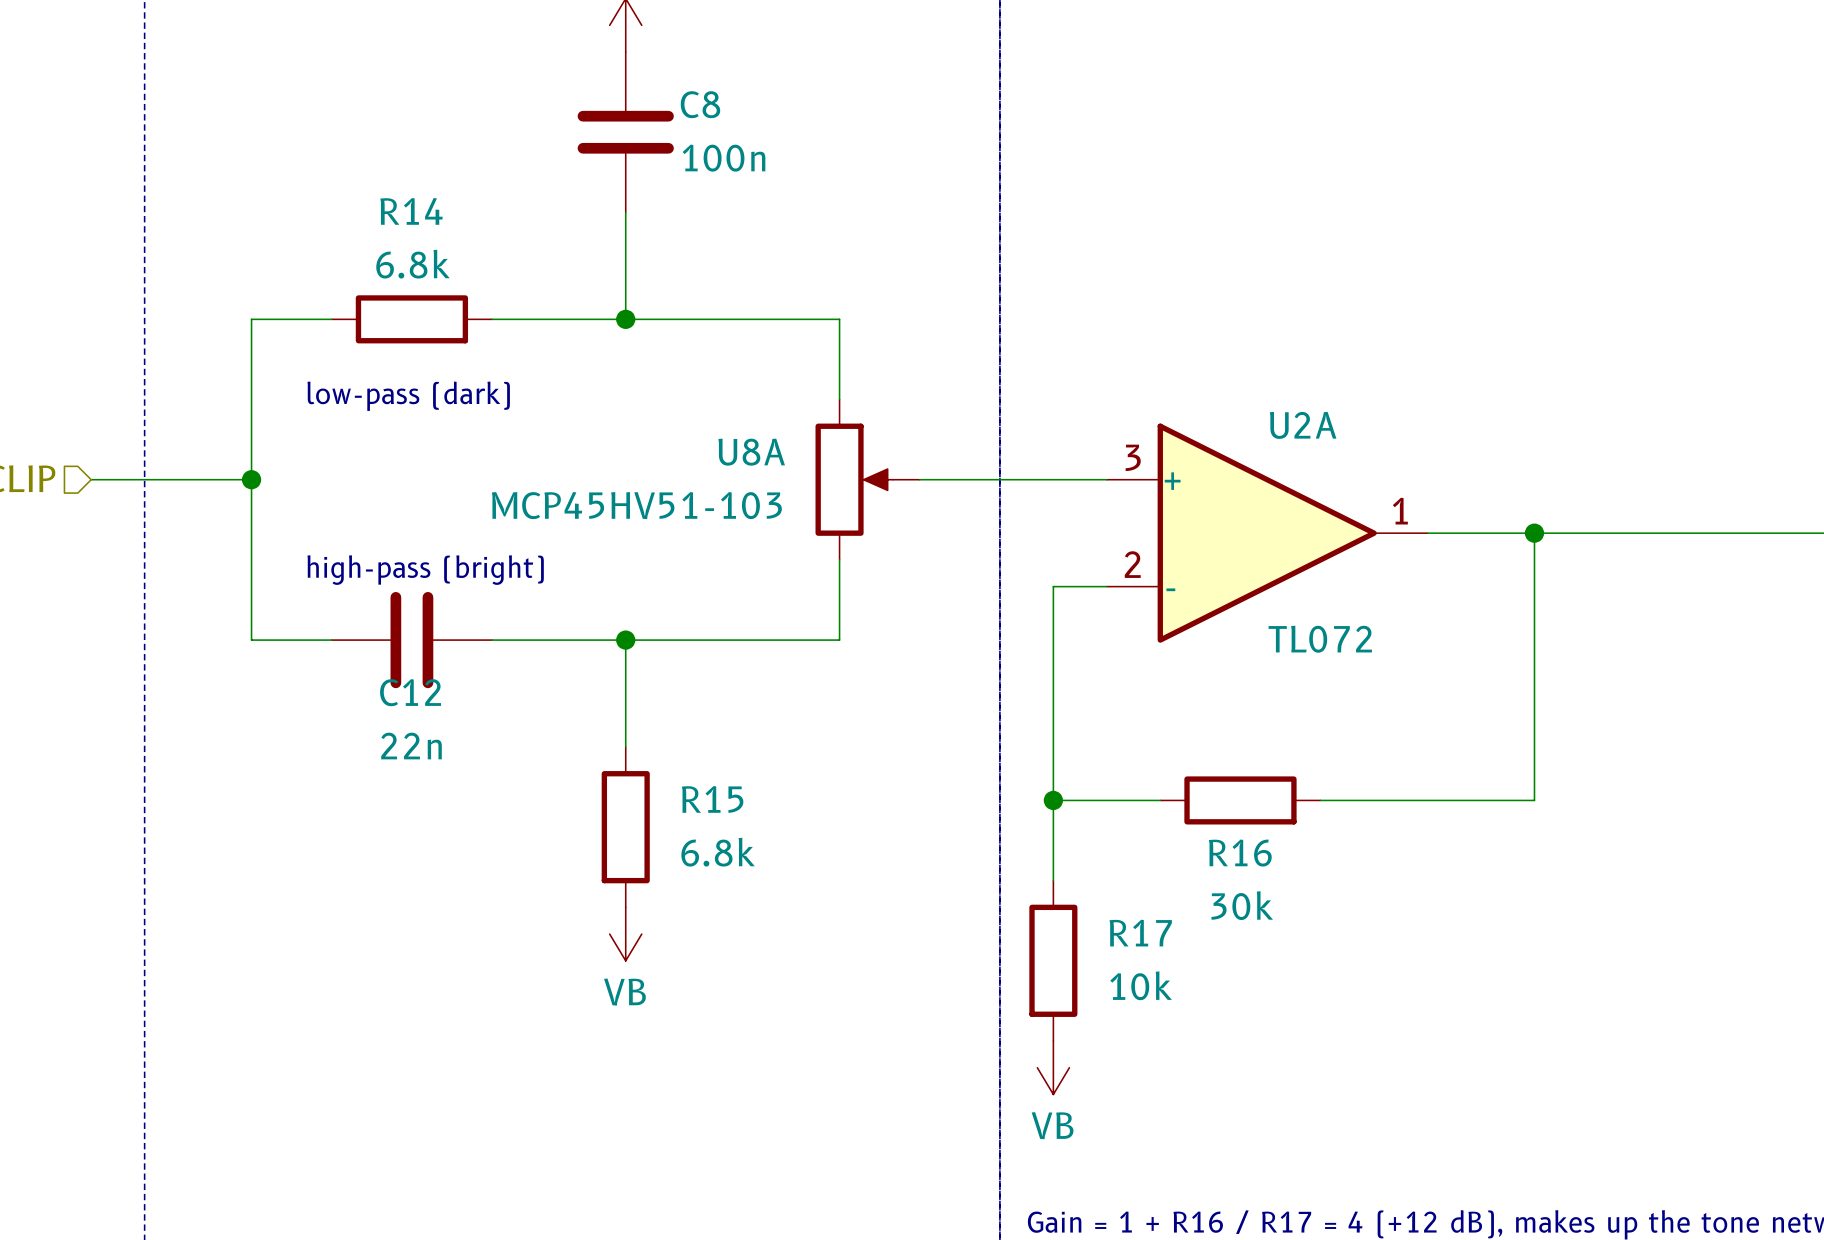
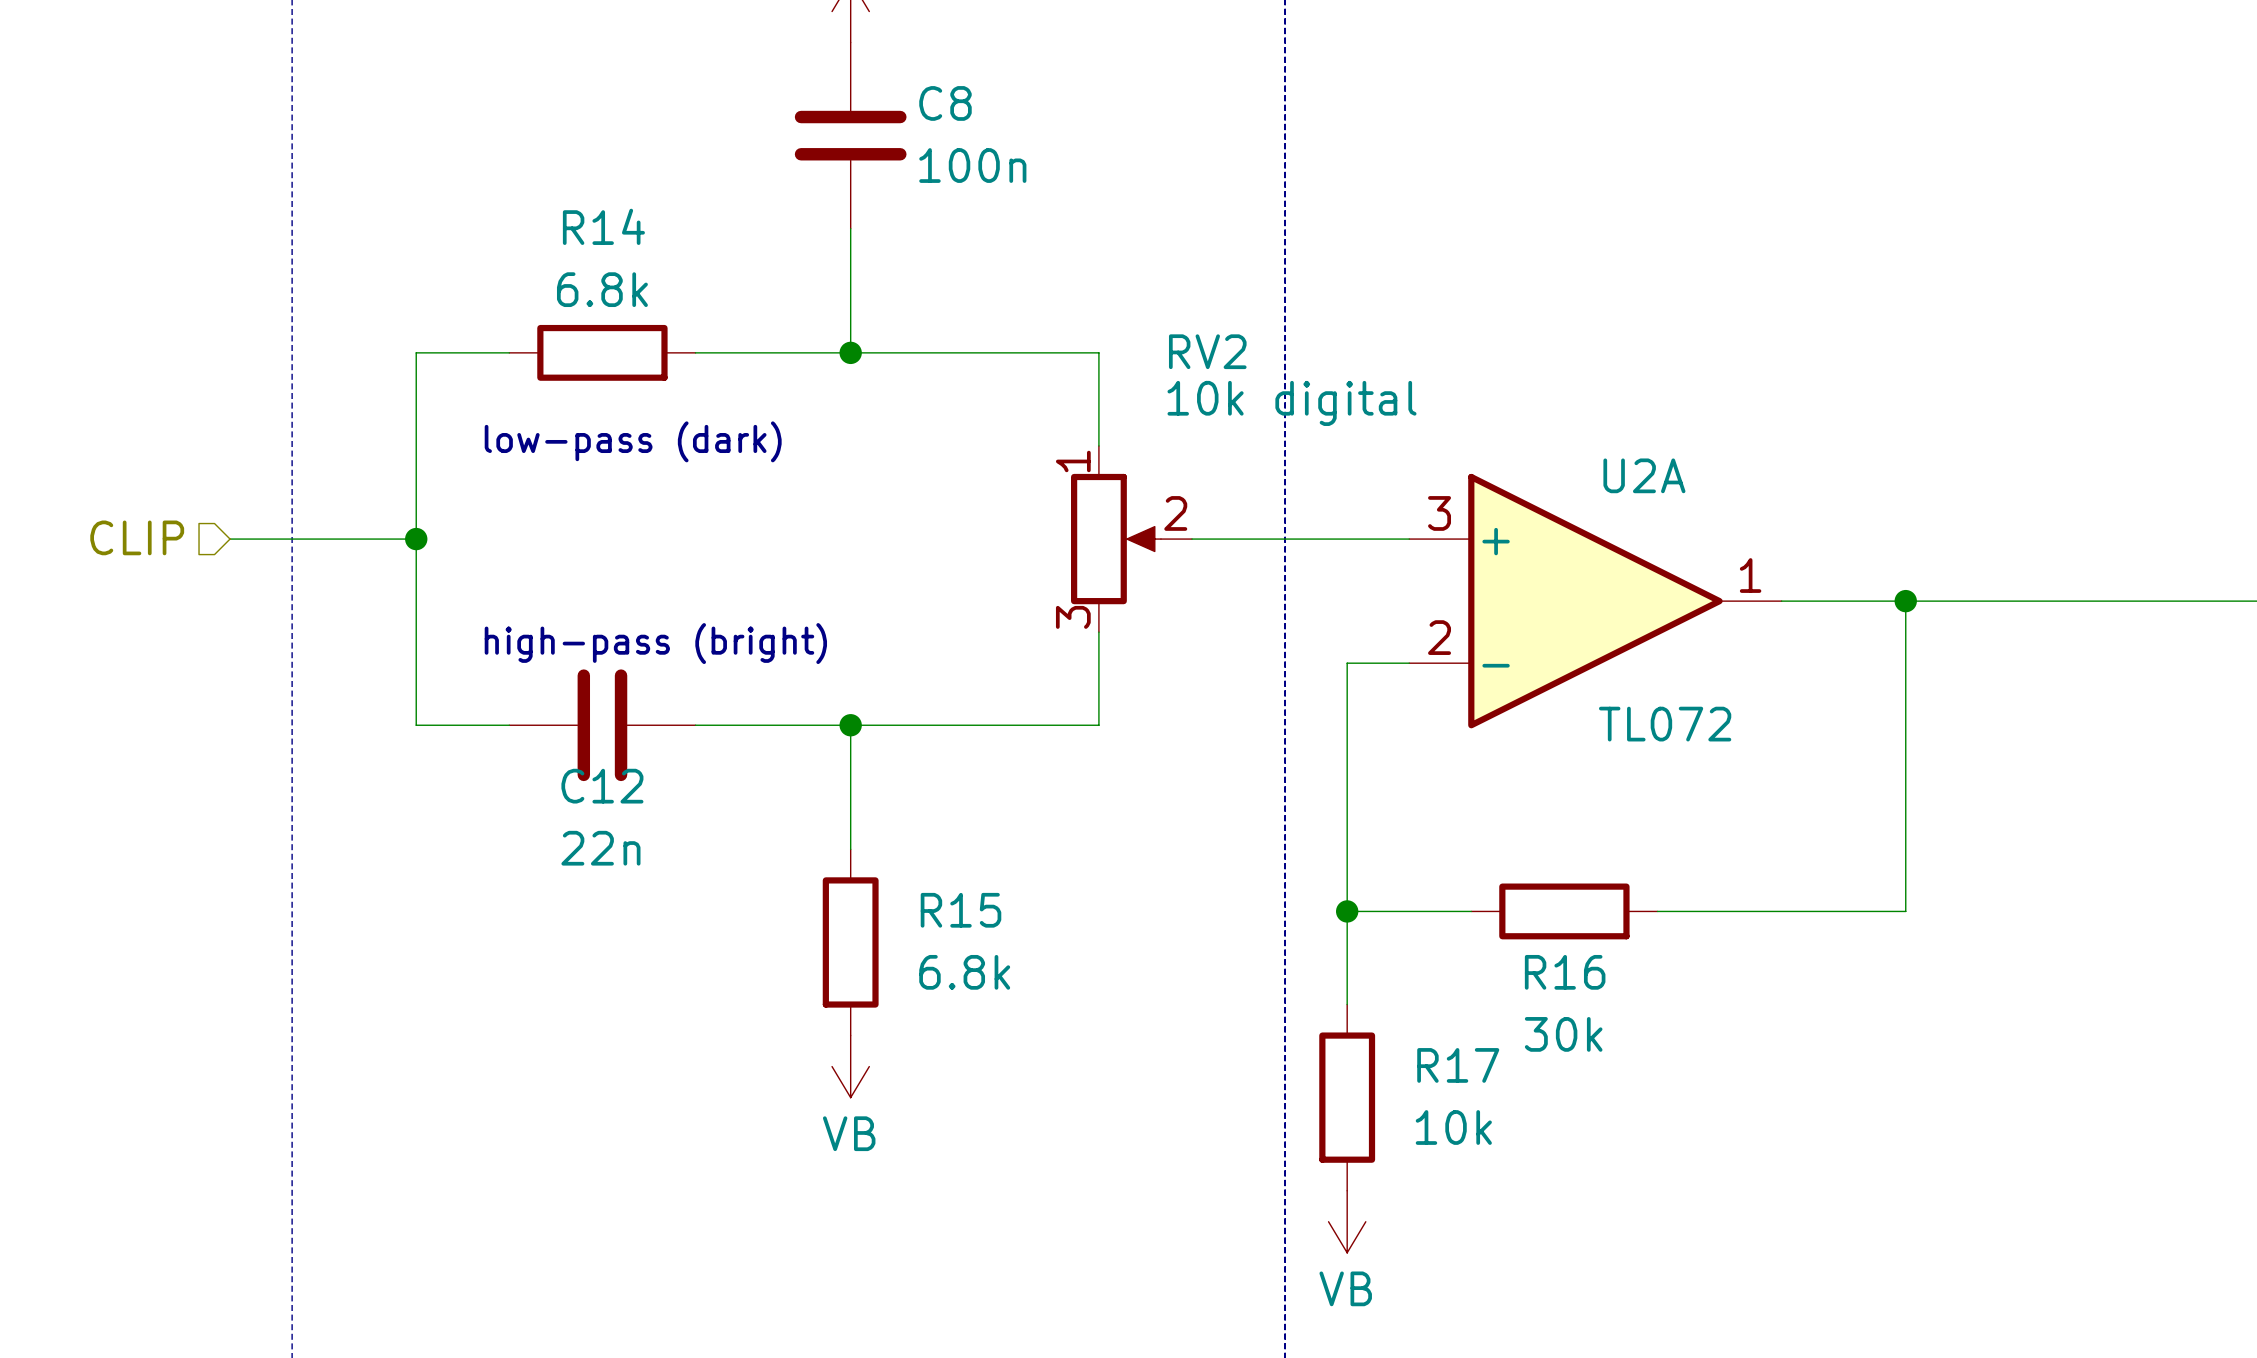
U8A pin number: none -> 1 (1073, 461)
U8A name: U8A (751, 452) -> RV2 (1207, 351)
U8A pin number: none -> 2 (1175, 513)
U8A value: MCP45HV51-103 (636, 505) -> 10k digital (1292, 403)
U8A pin number: none -> 3 (1073, 617)

